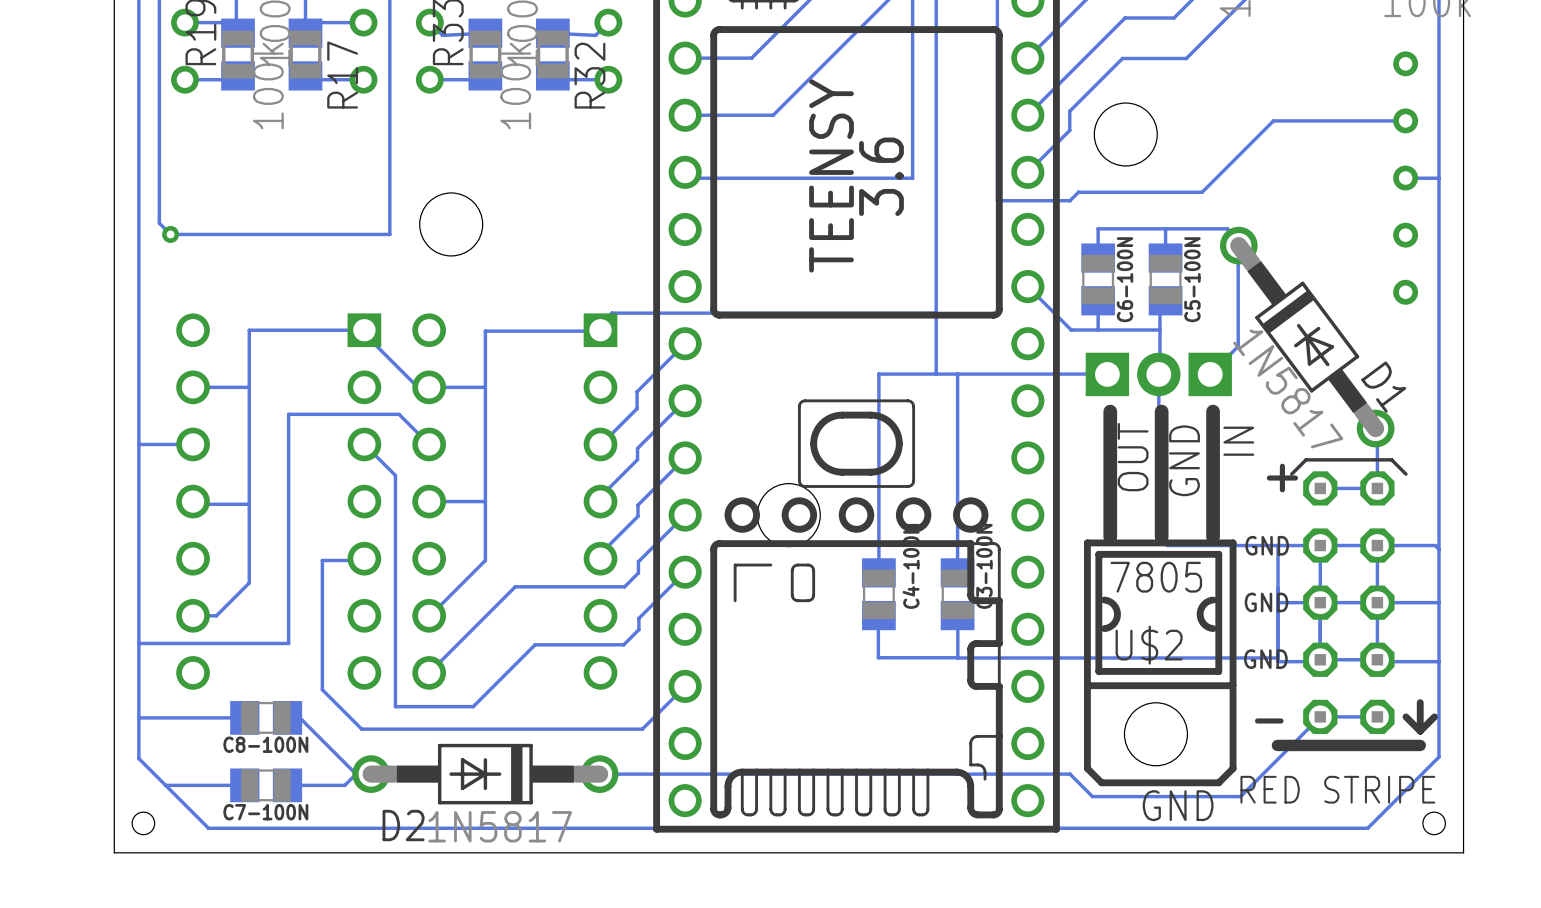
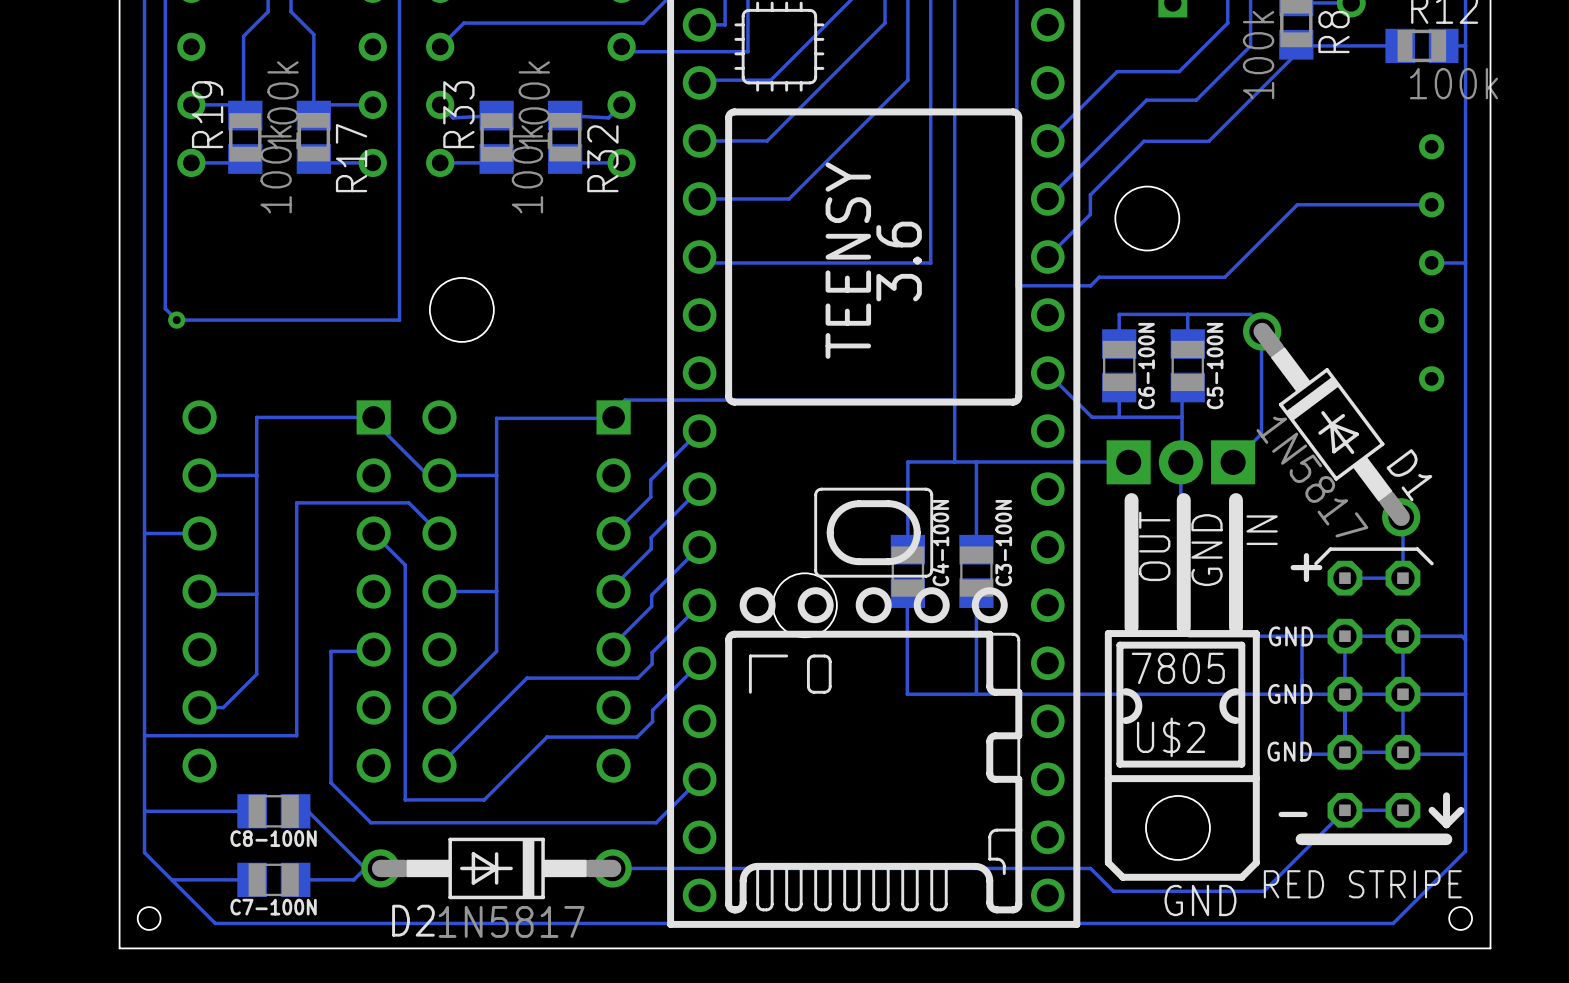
track: (890, 374) (878, 374) (878, 572) -> (907, 461) (907, 549)
track: (957, 460) (957, 503) -> none
track: none -> (907, 593) (907, 694) (1302, 694)
track: none -> (976, 663) (976, 694)
C4-100N position: (878, 594) -> (907, 571)
C3-100N position: (957, 594) -> (976, 571)
track: (878, 615) (878, 657) (957, 657) -> none
track: (957, 615) (957, 657) (1278, 657) -> none

